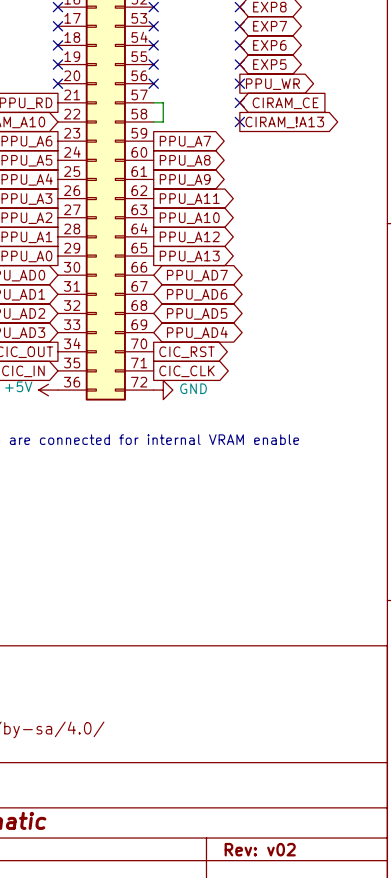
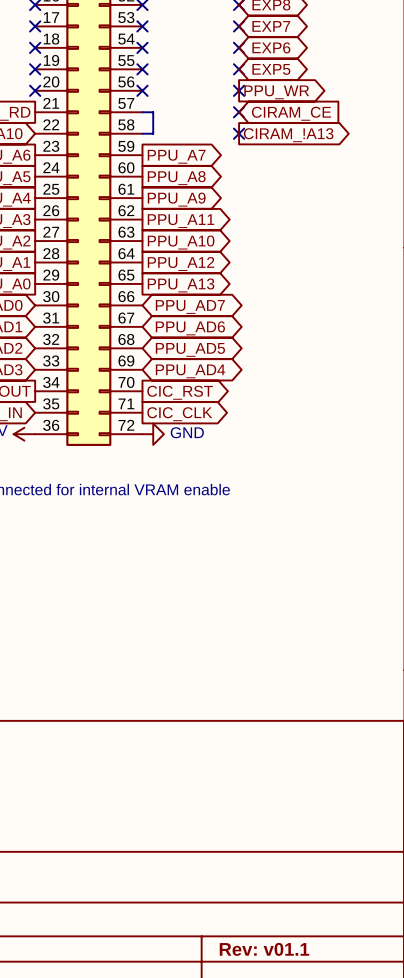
title block: Rev: v02 (260, 849) -> Rev: v01.1 (264, 949)

